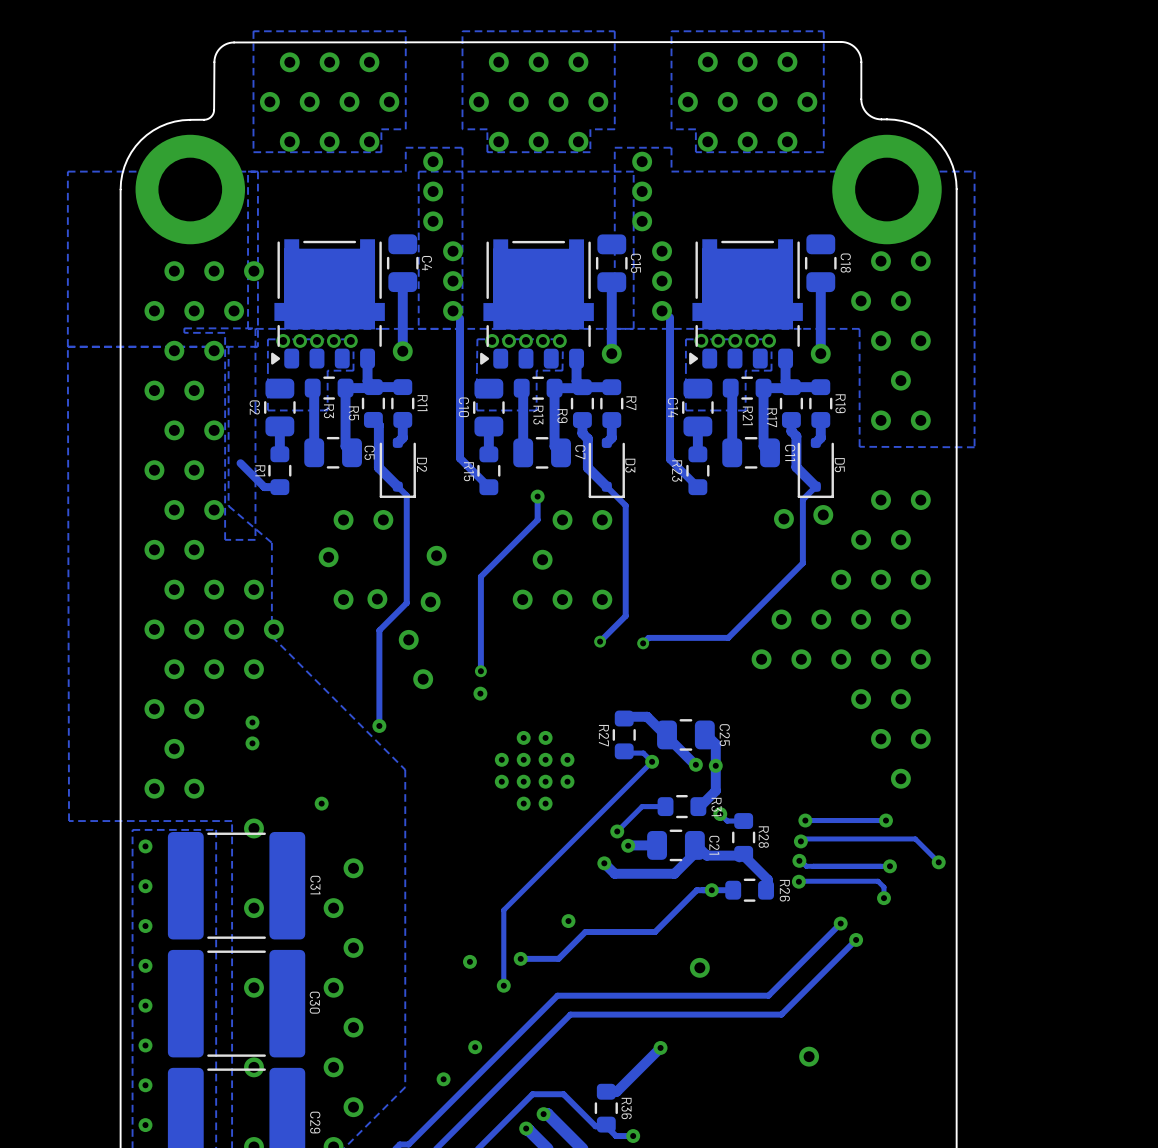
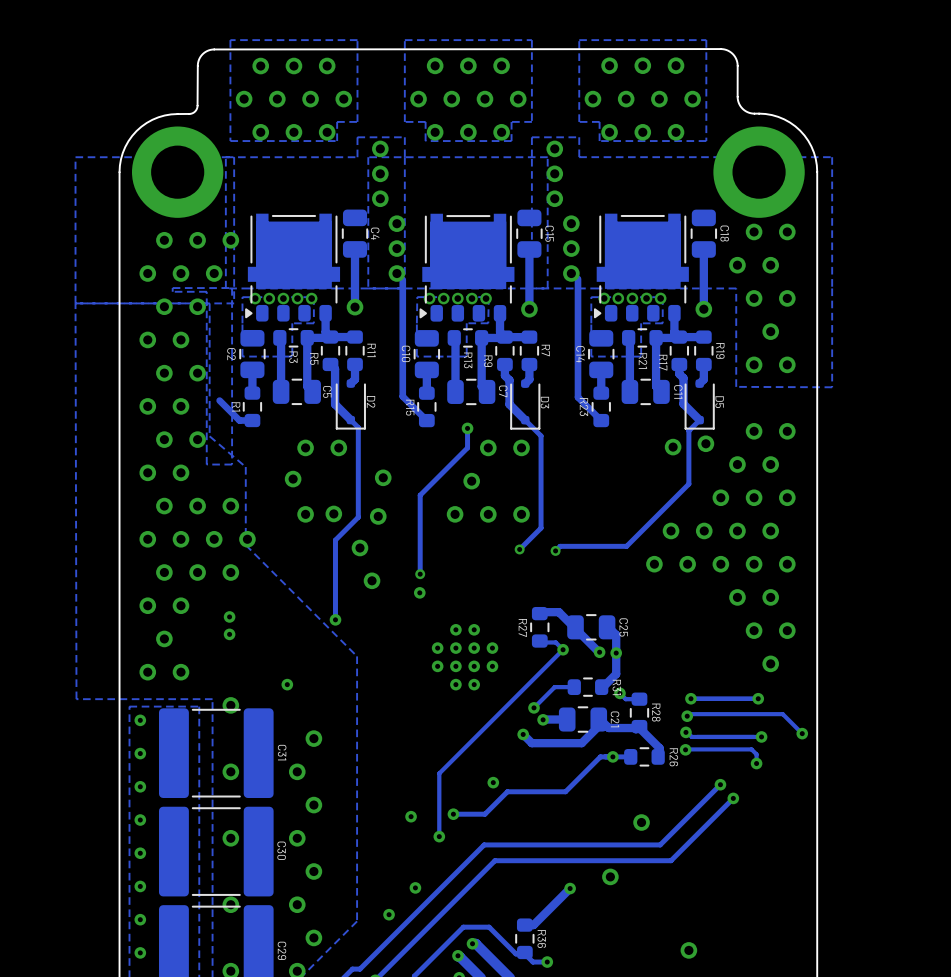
via: (699, 967) -> none
via: none -> (641, 822)
via: none -> (610, 876)
via: (809, 1056) -> none
via: none -> (688, 950)

